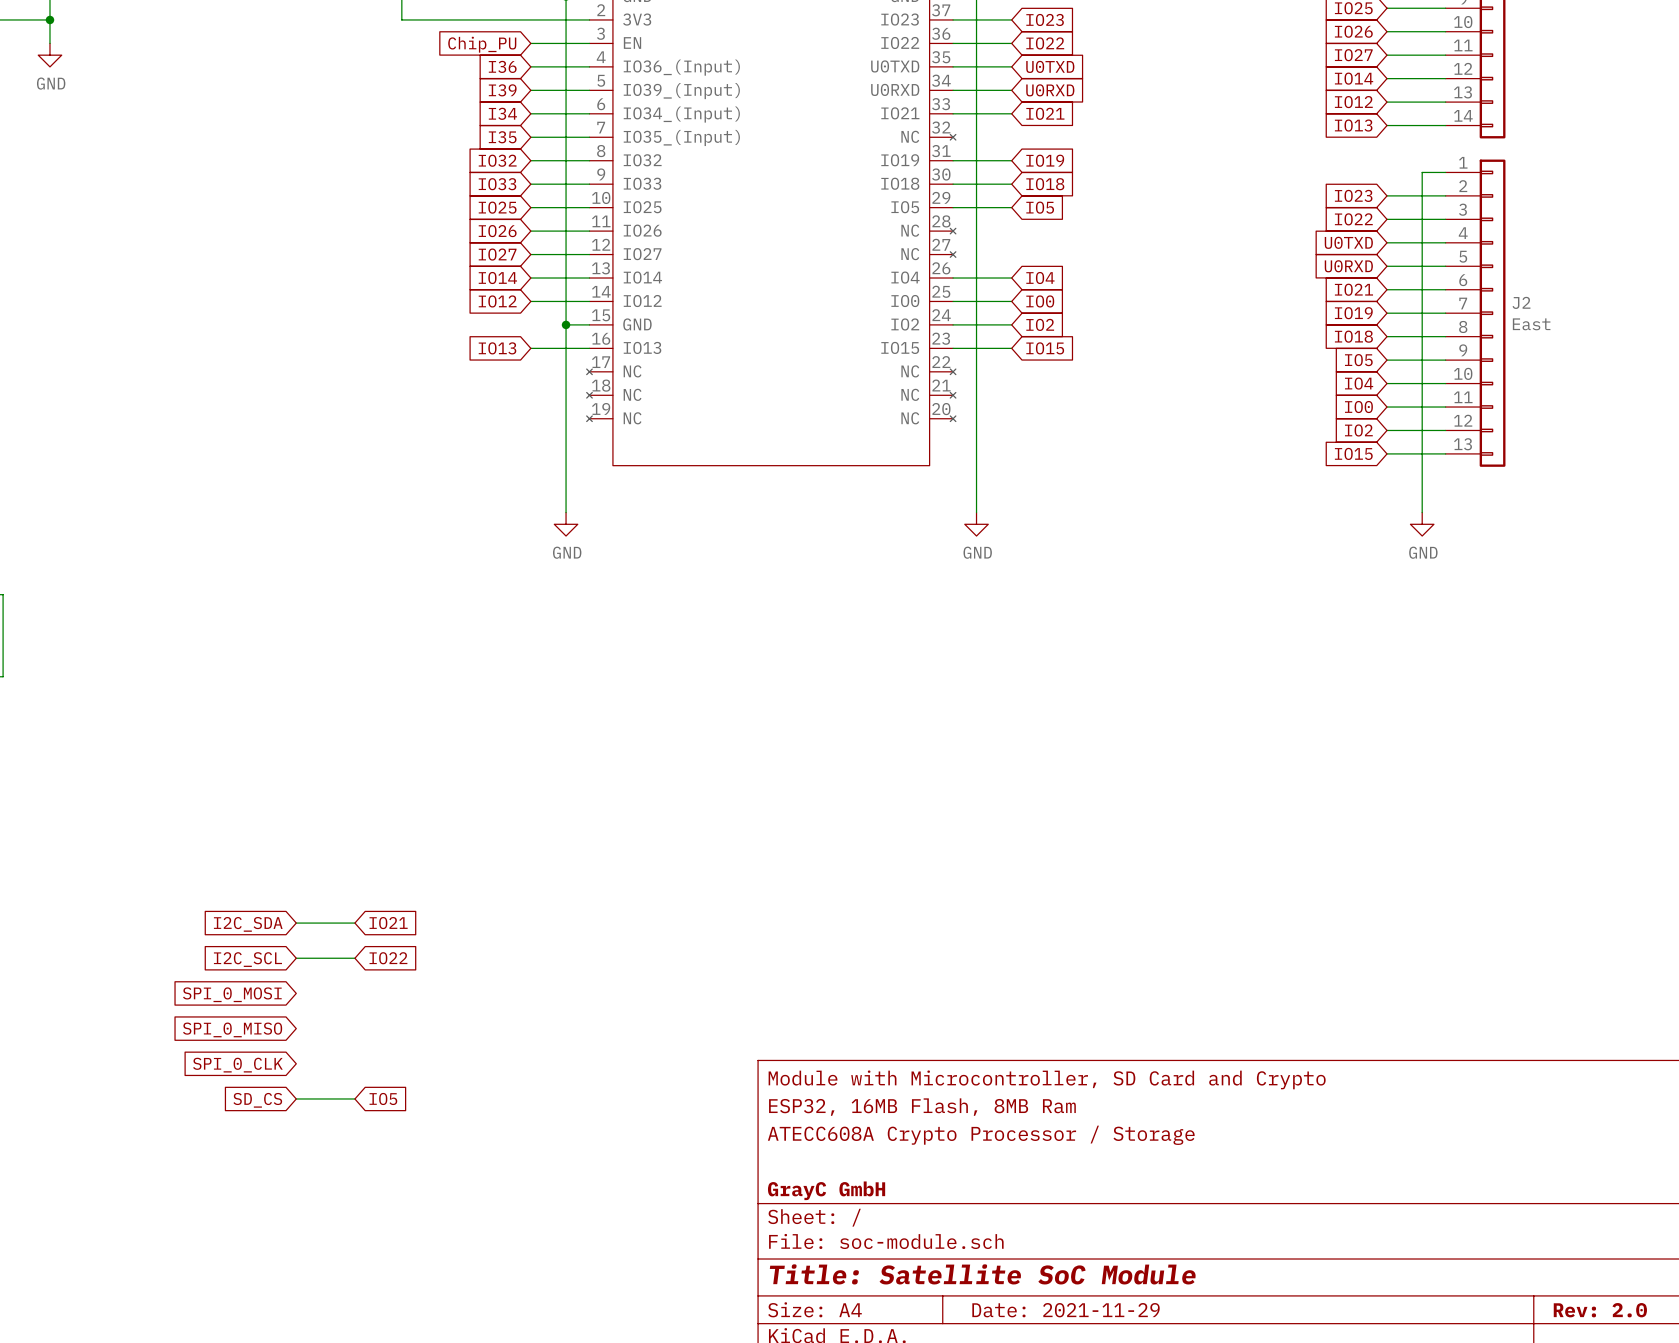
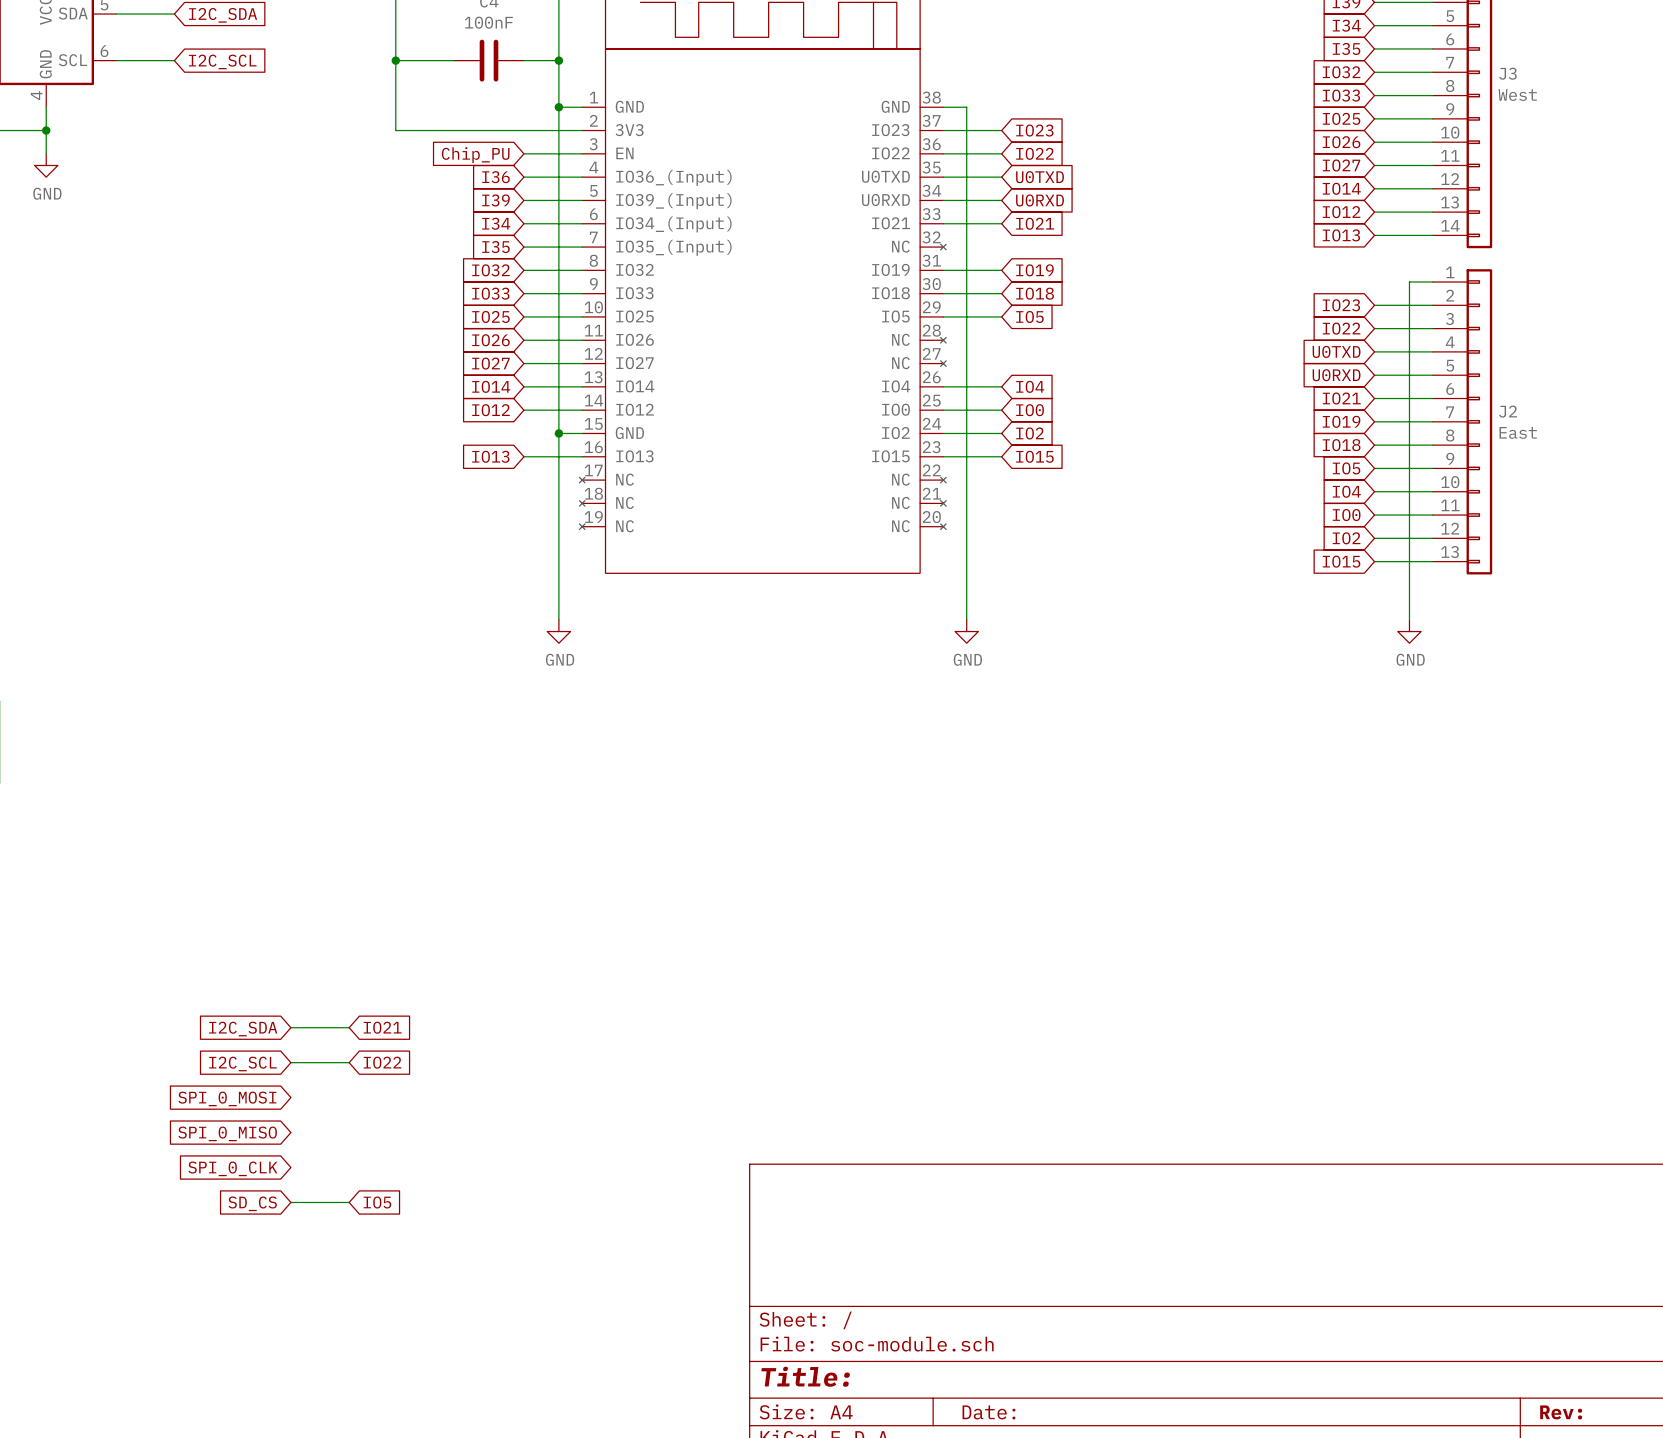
title block: Module with Microcontroller, SD Card and Crypto (1047, 1079) -> none
title block: ESP32, 16MB Flash, 8MB Ram (922, 1107) -> none
title block: ATECC608A Crypto Processor / Storage (981, 1135) -> none
title block: GrayC GmbH (826, 1190) -> none
title block: Title: Satellite SoC Module (982, 1274) -> Title: (805, 1376)
title block: Date: 2021-11-29 (1066, 1310) -> Date: (988, 1412)
title block: Rev: 2.0 (1600, 1310) -> Rev: (1561, 1412)

